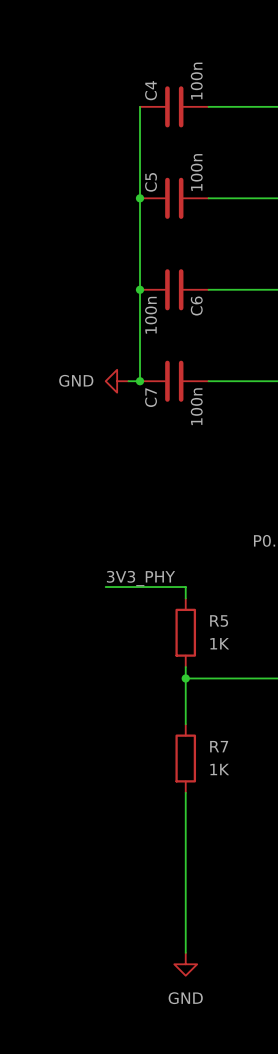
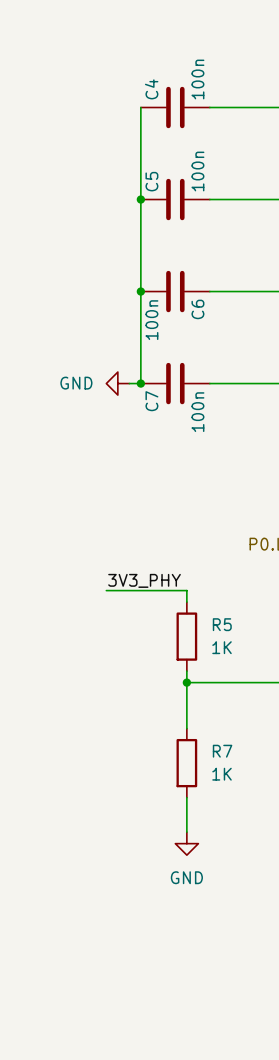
wire: (185, 827) (185, 952) -> none
power symbol position: GND (185, 964) -> GND (186, 843)

